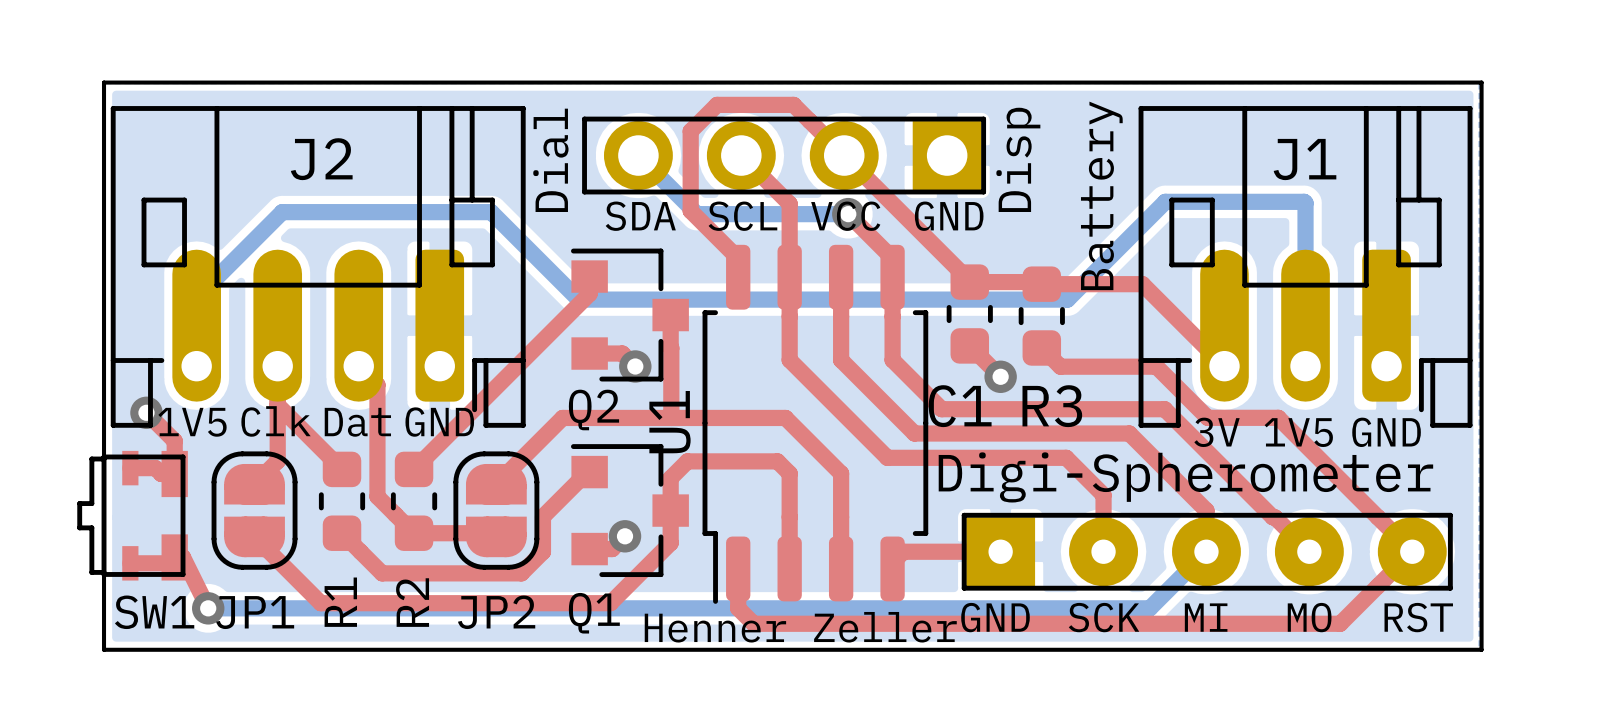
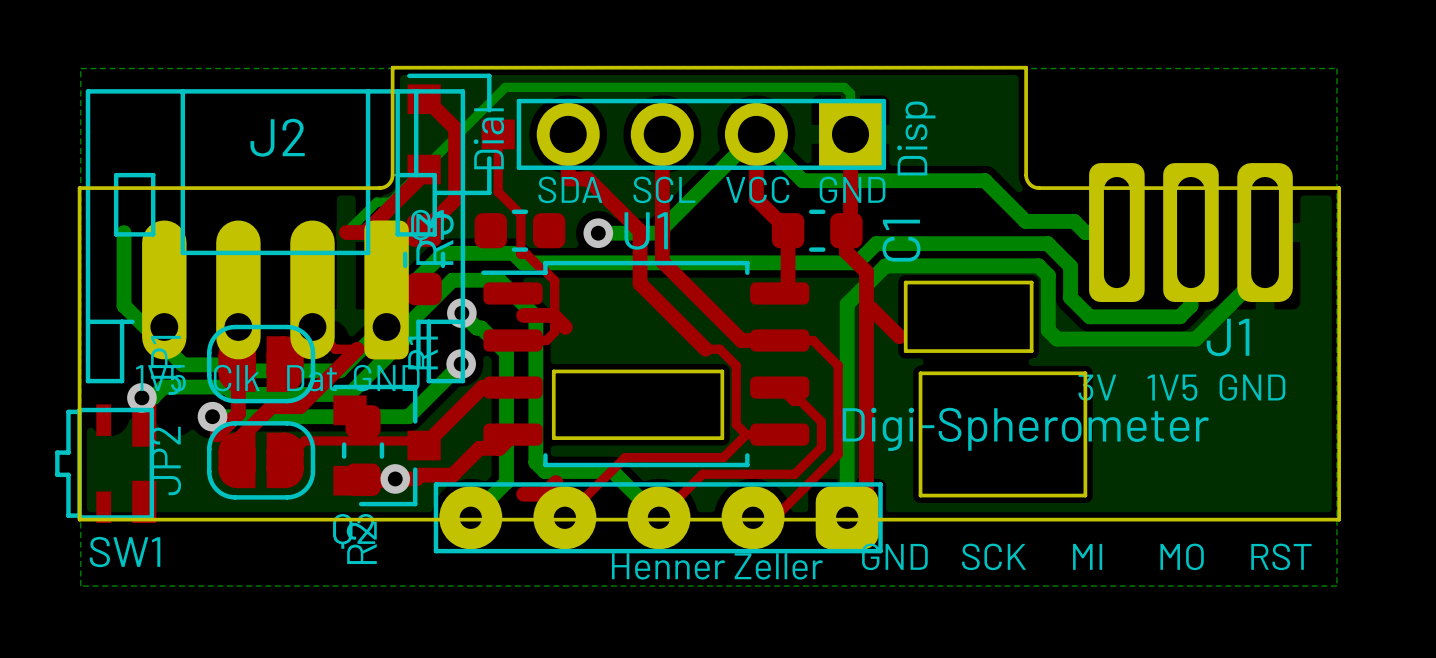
board edge: (446, 82) (104, 82) (104, 214) -> (392, 67) (392, 176) (389, 183) (384, 187) (79, 188)
board edge: (1139, 82) (1481, 82) (1481, 214) -> (1026, 67) (1026, 176) (1028, 183) (1034, 187) (1339, 188)
J1 footprint: [1138, 106, 1473, 428] -> [1078, 163, 1306, 303]
top track: none -> (424, 99) (455, 128) (455, 199) (424, 230)
top track: none -> (498, 134) (498, 192) (520, 214) (520, 254) (526, 254) (554, 280) (554, 332) (546, 340) (505, 340)
top track: none -> (568, 134) (568, 178) (587, 178) (640, 231) (640, 283) (705, 349) (719, 349) (736, 365) (736, 424) (746, 434)
bottom track: (638, 155) (697, 214) (848, 214) -> none
top track: (741, 155) (789, 203) (789, 360) (887, 457) (1066, 457) (1103, 495) (1103, 551) -> (662, 134) (662, 261) (741, 340) (813, 340) (838, 365) (838, 454) (775, 516) (754, 516)
top track: none -> (756, 134) (756, 199) (788, 230) (788, 285) (779, 293)
top track: none -> (850, 134) (850, 226) (846, 230) (846, 251) (866, 272) (866, 498) (861, 502)
bottom track: none -> (850, 134) (850, 93) (844, 87) (505, 87) (390, 202) (376, 202) (346, 232)
J1 name position: J1 (1305, 159) -> J1 (1228, 337)
top track: none -> (424, 169) (424, 173) (365, 232) (346, 232)
J1 value: Battery (1101, 195) -> none
top track: (848, 214) (892, 258) (892, 360) (941, 409) (1164, 409) (1309, 551) -> none
via: (848, 214) -> none
top track: (738, 258) (690, 210) (690, 131) (717, 104) (793, 104) (969, 282) (1142, 284) (1224, 366) -> none
bottom track: none -> (124, 232) (124, 305) (183, 364) (235, 364) (241, 370) (339, 370) (388, 321) (388, 307) (443, 253) (513, 253) (522, 262) (857, 262) (876, 243) (1047, 243) (1070, 266) (1070, 297) (1089, 316) (1179, 316) (1190, 305) (1190, 232)
bottom track: none -> (1116, 232) (1085, 232) (1074, 221) (1025, 221) (985, 180) (802, 180) (756, 134) (657, 233) (598, 233)
bottom track: none -> (1265, 232) (1265, 269) (1195, 339) (1057, 339) (1048, 330) (1048, 275) (1038, 265) (885, 265) (847, 304) (847, 502)
via: none -> (598, 233)
top track: (841, 270) (841, 360) (914, 433) (1129, 433) (1206, 510) (1206, 551) -> none
top track: (589, 276) (589, 293) (414, 469) -> none
C1 rotation: 0° (969, 314) -> 90° clockwise (817, 230)
C1 position: (969, 314) -> (817, 230)
Q2 position: (629, 315) -> (386, 445)
top track: (670, 315) (671, 417) -> none
R3 rotation: 0° (1041, 316) -> 90° clockwise (519, 230)
R3 position: (1041, 316) -> (519, 230)
board edge: none -> (905, 282) (905, 351) (1031, 351) (1031, 282) (905, 282)
top track: (1041, 347) (1060, 366) (1156, 366) (1207, 417) (1278, 417) (1412, 551) (1340, 623) (753, 623) (738, 608) (738, 562) -> none
bottom track: none -> (461, 313) (476, 328) (481, 328) (506, 353) (506, 482) (485, 502)
via: none -> (461, 313)
bottom track: (196, 366) (196, 297) (282, 212) (491, 212) (578, 299) (1067, 299) (1165, 201) (1305, 203) (1305, 366) -> none
top track: (358, 366) (377, 384) (377, 496) (414, 533) (492, 533) (496, 536) -> none
via: (635, 366) -> none
via: (1000, 376) -> none
top track: none -> (327, 341) (335, 349) (357, 349) (300, 406) (271, 406) (237, 441) (237, 460)
top track: (277, 405) (342, 469) -> none
bottom track: none -> (461, 364) (408, 416) (212, 416)
via: none -> (461, 364)
C1 name position: C1 (960, 406) -> C1 (901, 240)
top track: (146, 412) (174, 441) (174, 473) (161, 473) (155, 468) (130, 468) -> none
via position: (146, 412) -> (141, 397)
board edge: none -> (553, 371) (722, 371) (722, 438) (553, 438) (553, 371)
board edge: none -> (920, 373) (920, 495) (1085, 495) (1085, 373) (920, 373)
U1 rotation: 0° (815, 424) -> 90° clockwise (645, 364)
top track: none -> (505, 387) (482, 387) (424, 445)
top track: none -> (779, 387) (793, 401) (800, 401) (821, 421) (821, 447) (794, 474) (702, 474) (671, 505)
bottom track: none -> (141, 397) (152, 397) (163, 387) (226, 387) (234, 394) (349, 394) (411, 332) (411, 321) (452, 280) (499, 280) (535, 316) (535, 462) (544, 471) (612, 471) (644, 502)
via: none -> (212, 416)
top track: (589, 472) (542, 516) (542, 551) (521, 573) (382, 573) (342, 533) -> none
top track: none -> (513, 434) (499, 448) (479, 448) (452, 475) (420, 475) (416, 478) (395, 478) (393, 480) (350, 480)
top track: none -> (746, 434) (723, 457) (625, 457) (576, 505)
top track: (496, 484) (562, 417) (785, 417) (841, 473) (841, 562) -> none
top track: none -> (424, 445) (417, 440) (304, 440) (285, 460)
R1 position: (342, 501) -> (424, 259)
JP1 rotation: 0° (254, 510) -> 90° clockwise (261, 364)
JP1 position: (254, 510) -> (261, 364)
JP2 rotation: 0° (496, 510) -> 90° clockwise (261, 460)
JP2 position: (496, 510) -> (261, 460)
Q1 position: (629, 510) -> (460, 134)
via: none -> (395, 478)
top track: (254, 536) (320, 603) (610, 603) (670, 542) (670, 478) (687, 461) (777, 461) (789, 473) (789, 562) -> none
via: (625, 536) -> none
top track: (1000, 551) (903, 551) (892, 562) -> none
bottom track: (1206, 551) (1149, 608) (208, 608) -> none
part: (1207, 551) -> none
top track: (130, 563) (168, 563) (174, 557) (183, 557) (208, 608) -> none
part: none -> (658, 517)
board edge: (104, 576) (104, 649) (1481, 649) (1481, 576) -> (79, 519) (1339, 519)
via: (208, 608) -> none

